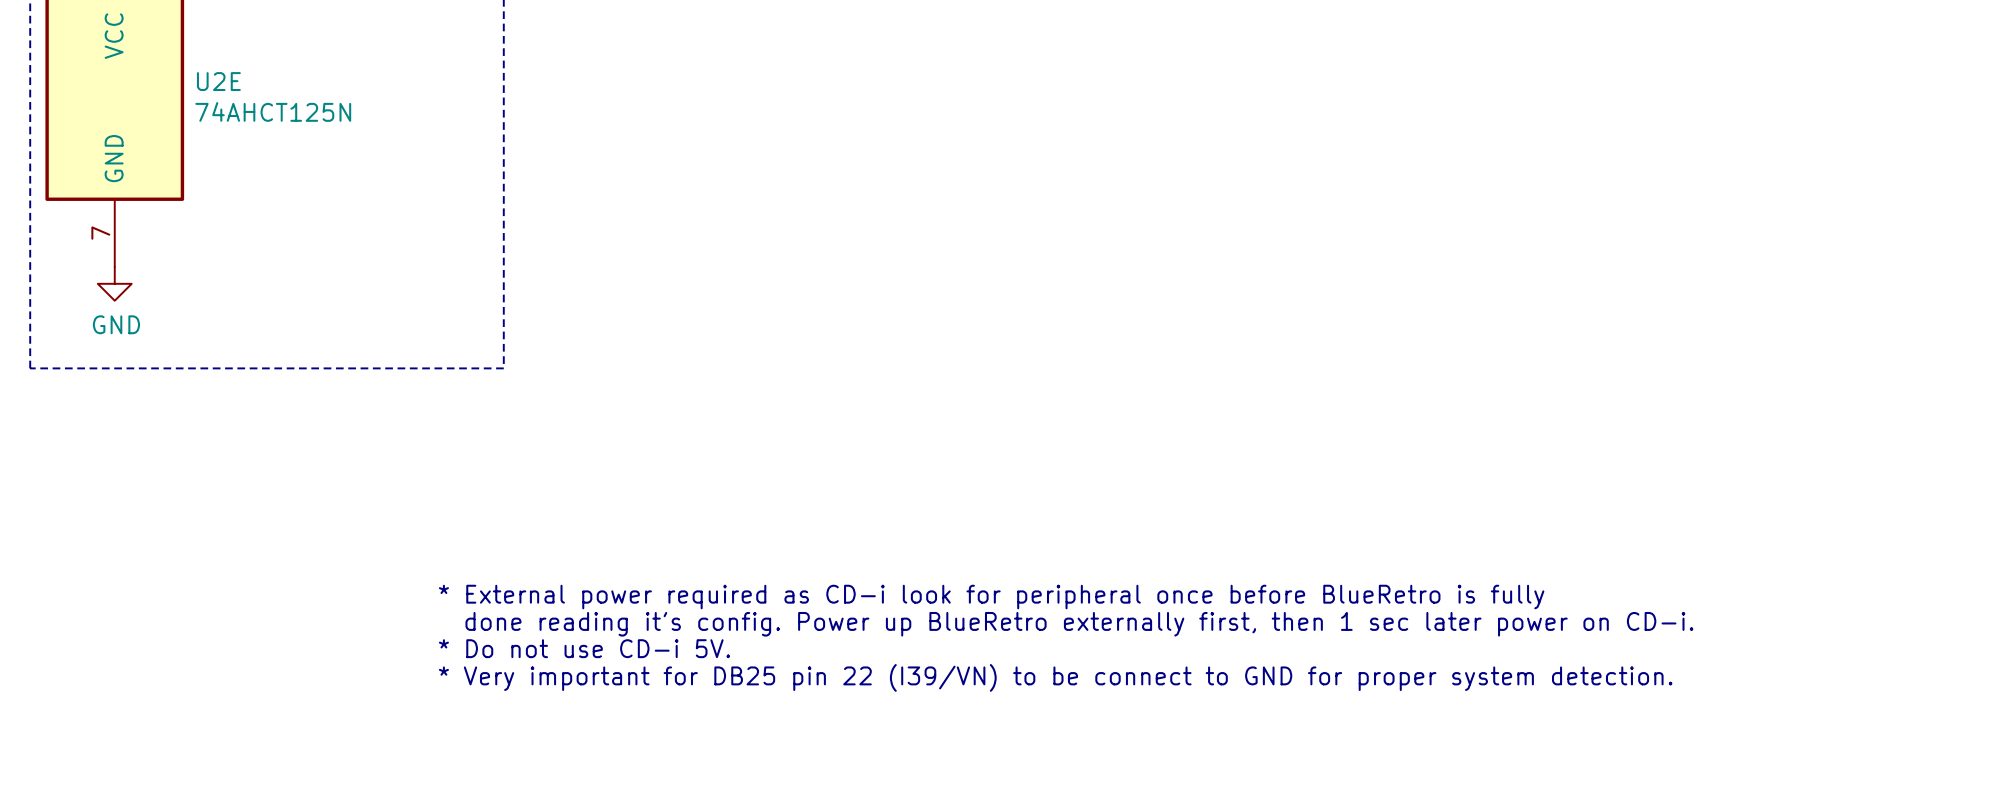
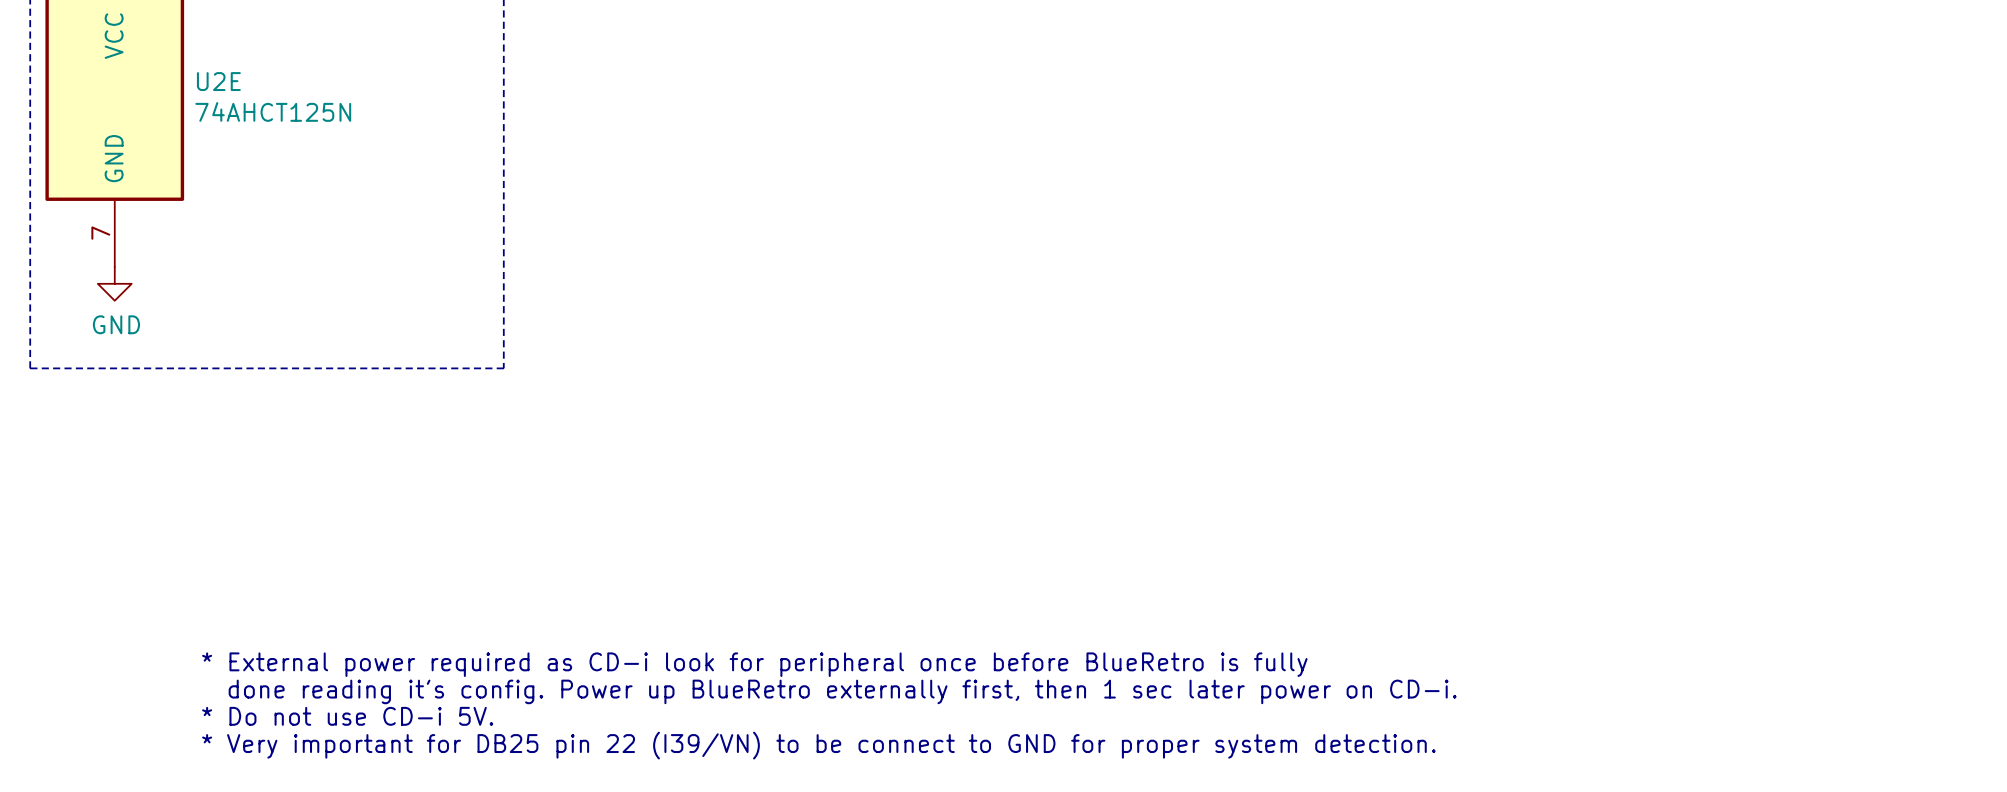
text position: * External power required as CD-i look for peripheral once before BlueRetro is fully (991, 597) -> * External power required as CD-i look for peripheral once before BlueRetro is fully (754, 664)
text position: done reading it's config. Power up BlueRetro externally first, then 1 sec later power on CD-i. (1079, 624) -> done reading it's config. Power up BlueRetro externally first, then 1 sec later power on CD-i. (842, 691)
text position: * Do not use CD-i 5V. (584, 648) -> * Do not use CD-i 5V. (347, 716)
text position: * Very important for DB25 pin 22 (I39/VN) to be connect to GND for proper system detection. (1055, 677) -> * Very important for DB25 pin 22 (I39/VN) to be connect to GND for proper system detection. (818, 745)

